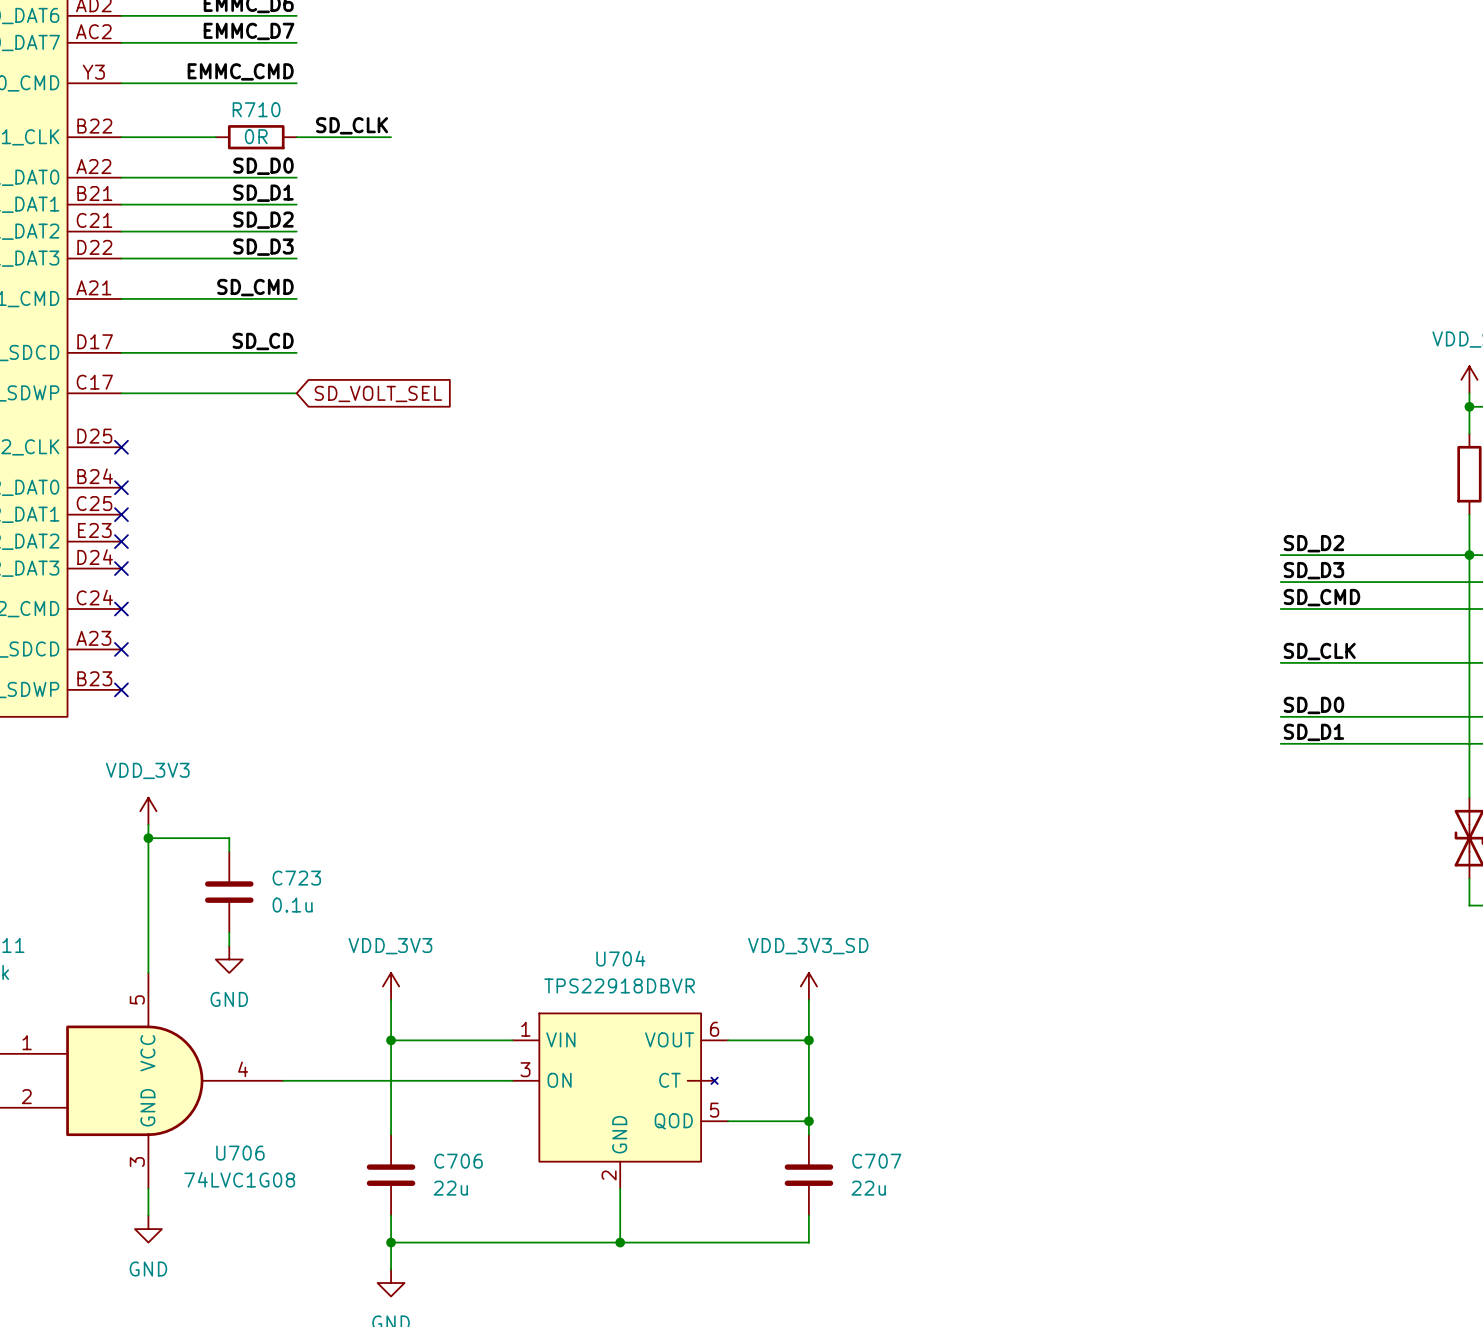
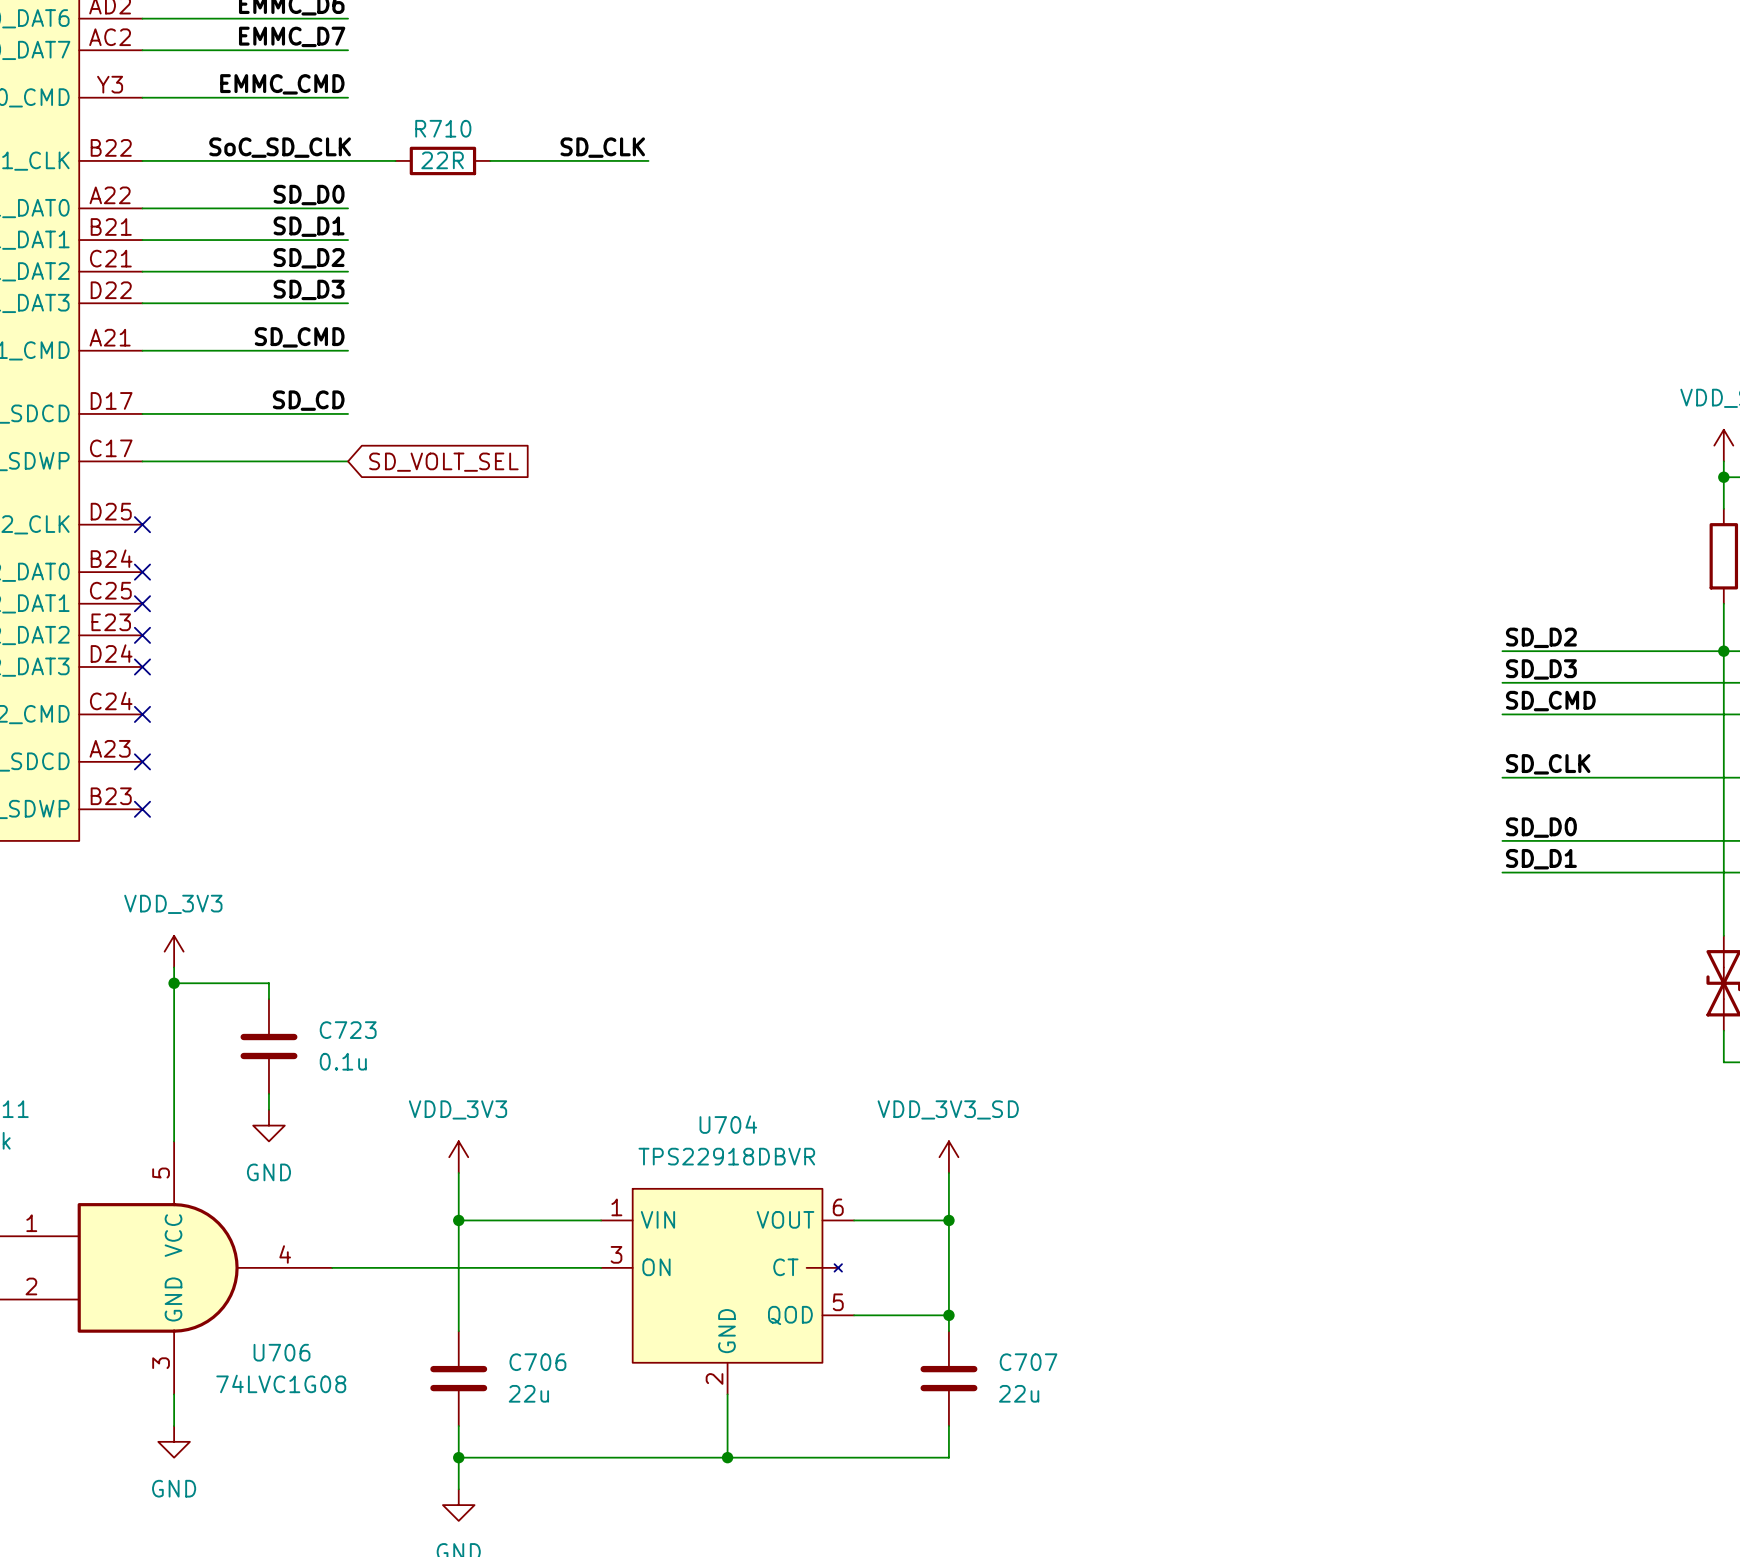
label: none -> SoC_SD_CLK (280, 147)
label position: SD_CLK (352, 125) -> SD_CLK (602, 147)
R710 value: 0R (256, 136) -> 22R (442, 160)
wire: none -> (253, 160) (348, 160)
R710 position: (256, 137) -> (442, 160)
wire: (337, 137) (391, 137) -> none
wire: none -> (490, 160) (648, 160)

